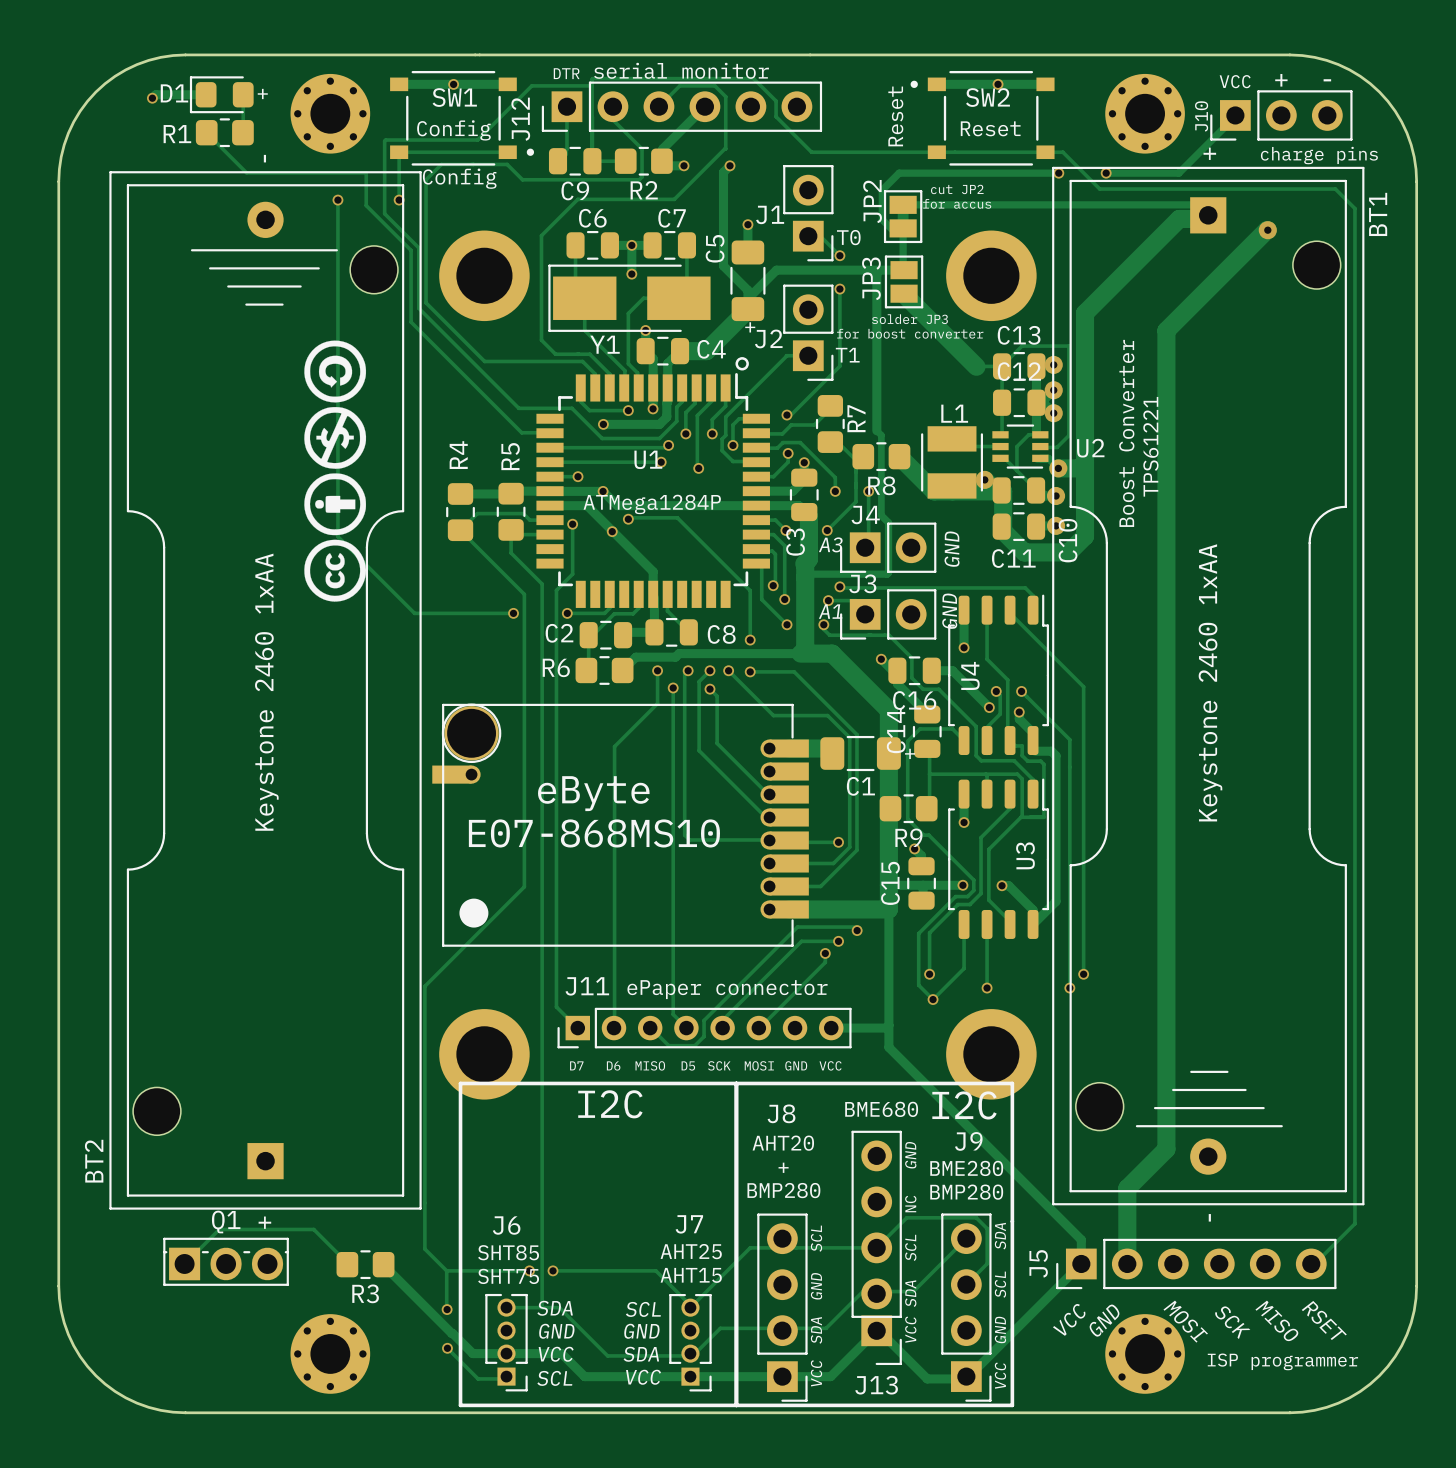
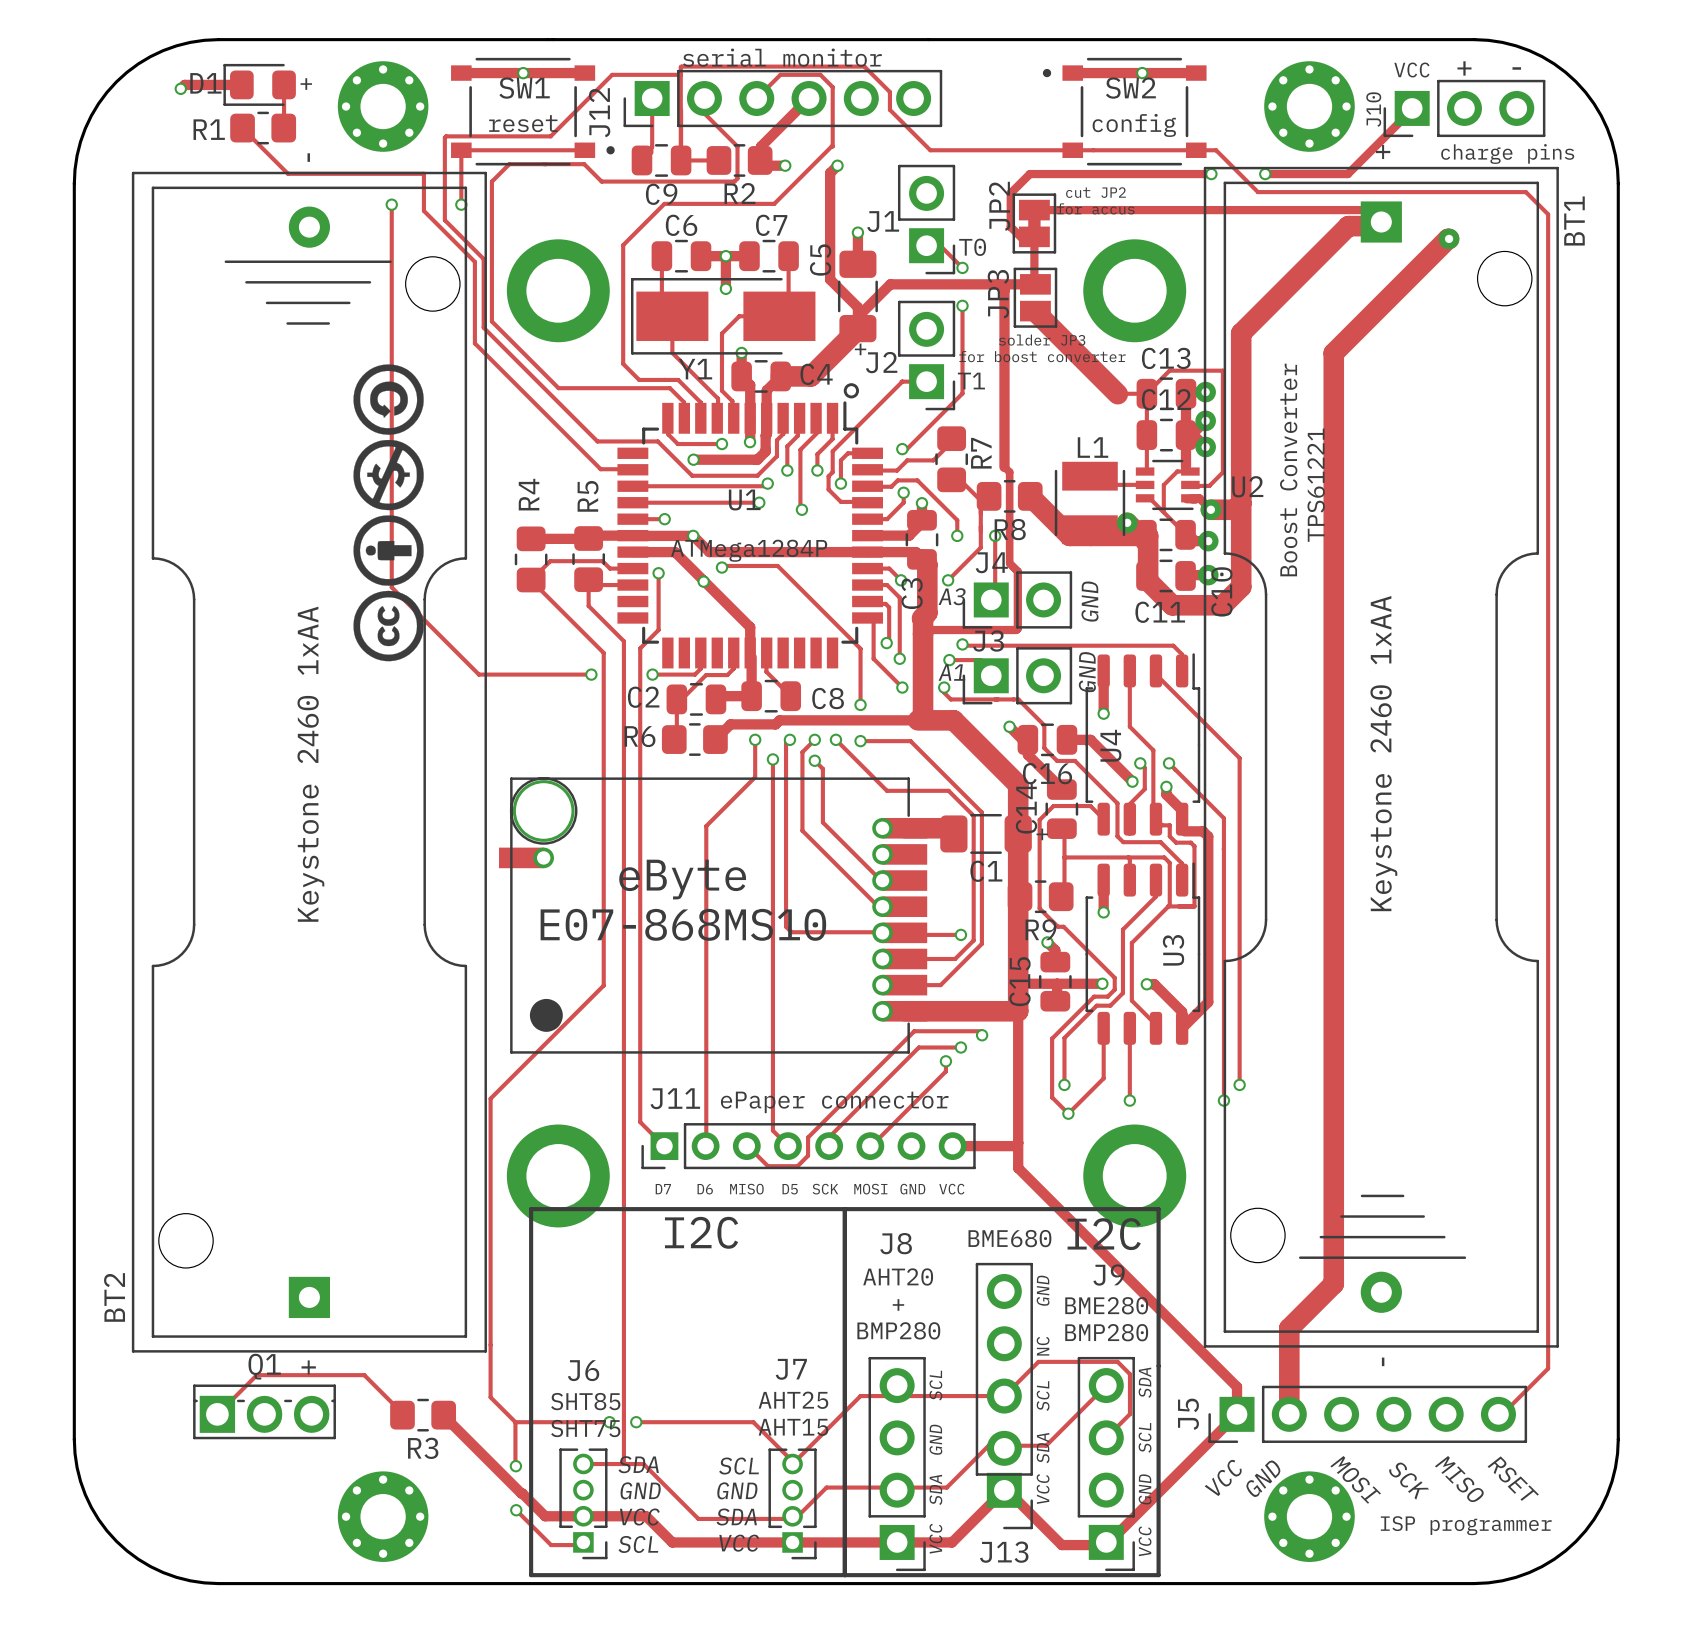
text: DTR (566, 73) -> none
text: Reset (895, 116) -> none
text: Reset (990, 128) -> config (1134, 125)
text: Config (453, 130) -> reset (523, 123)
text: Config (459, 178) -> none

